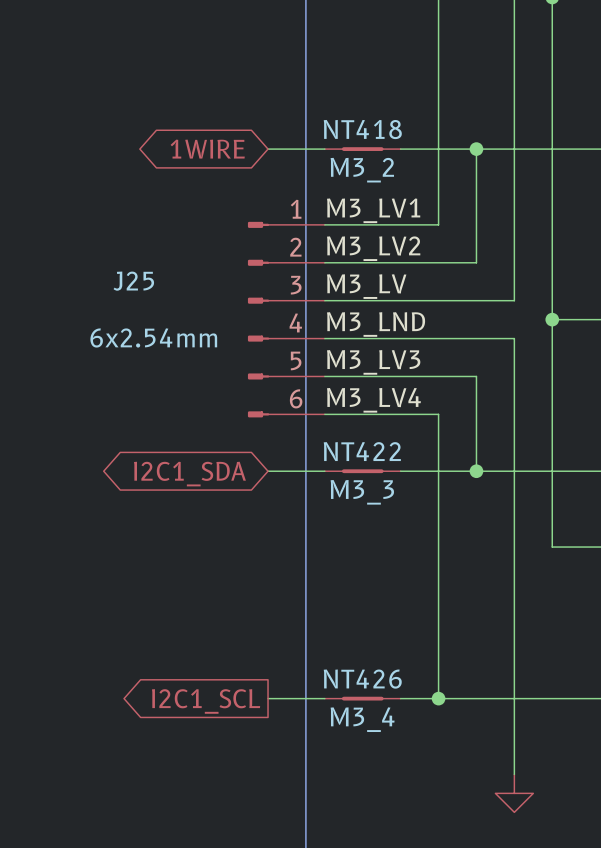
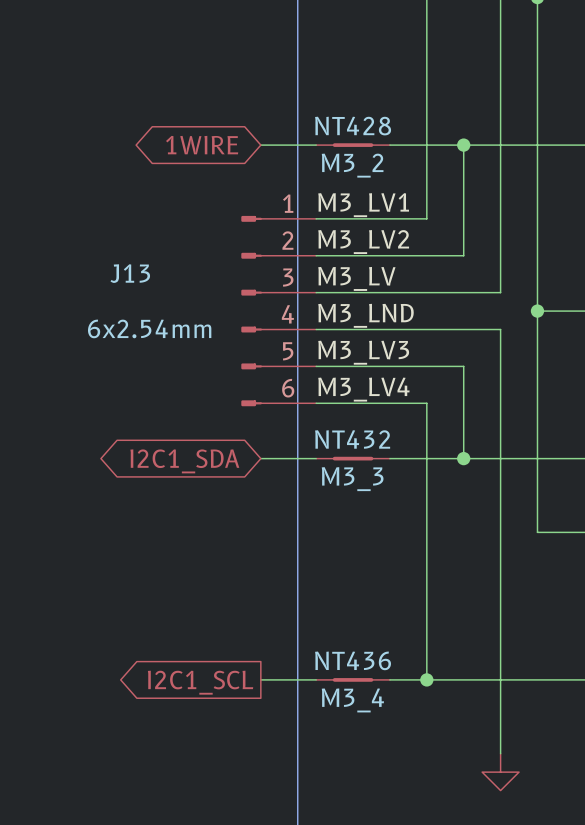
NT418 name: NT418 (362, 129) -> NT428 (353, 126)
J25 name: J25 (133, 281) -> J13 (130, 273)
NT422 name: NT422 (362, 451) -> NT432 (352, 439)
NT426 name: NT426 (362, 679) -> NT436 (353, 660)

